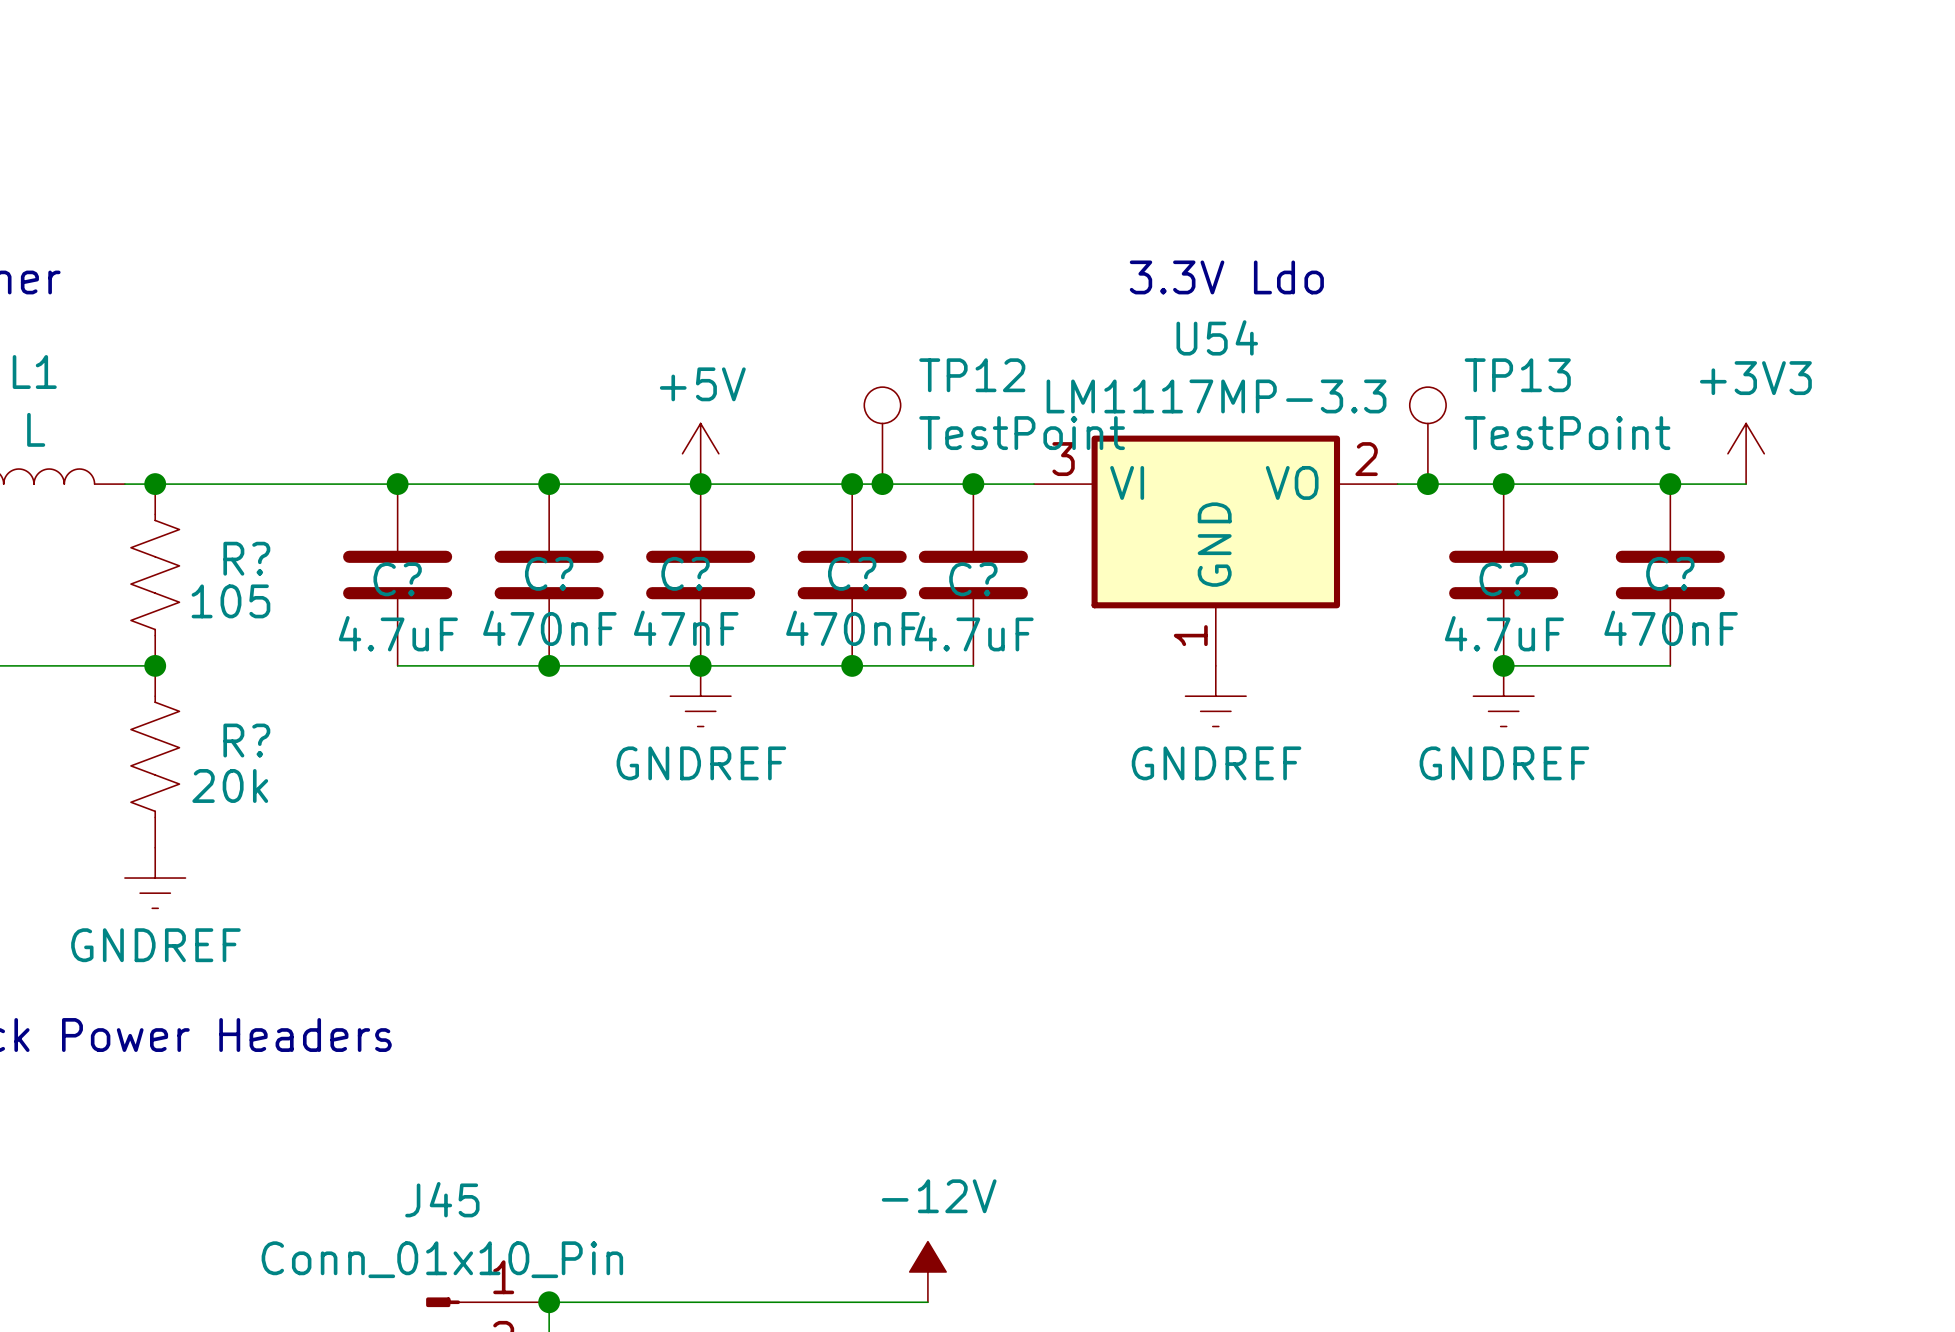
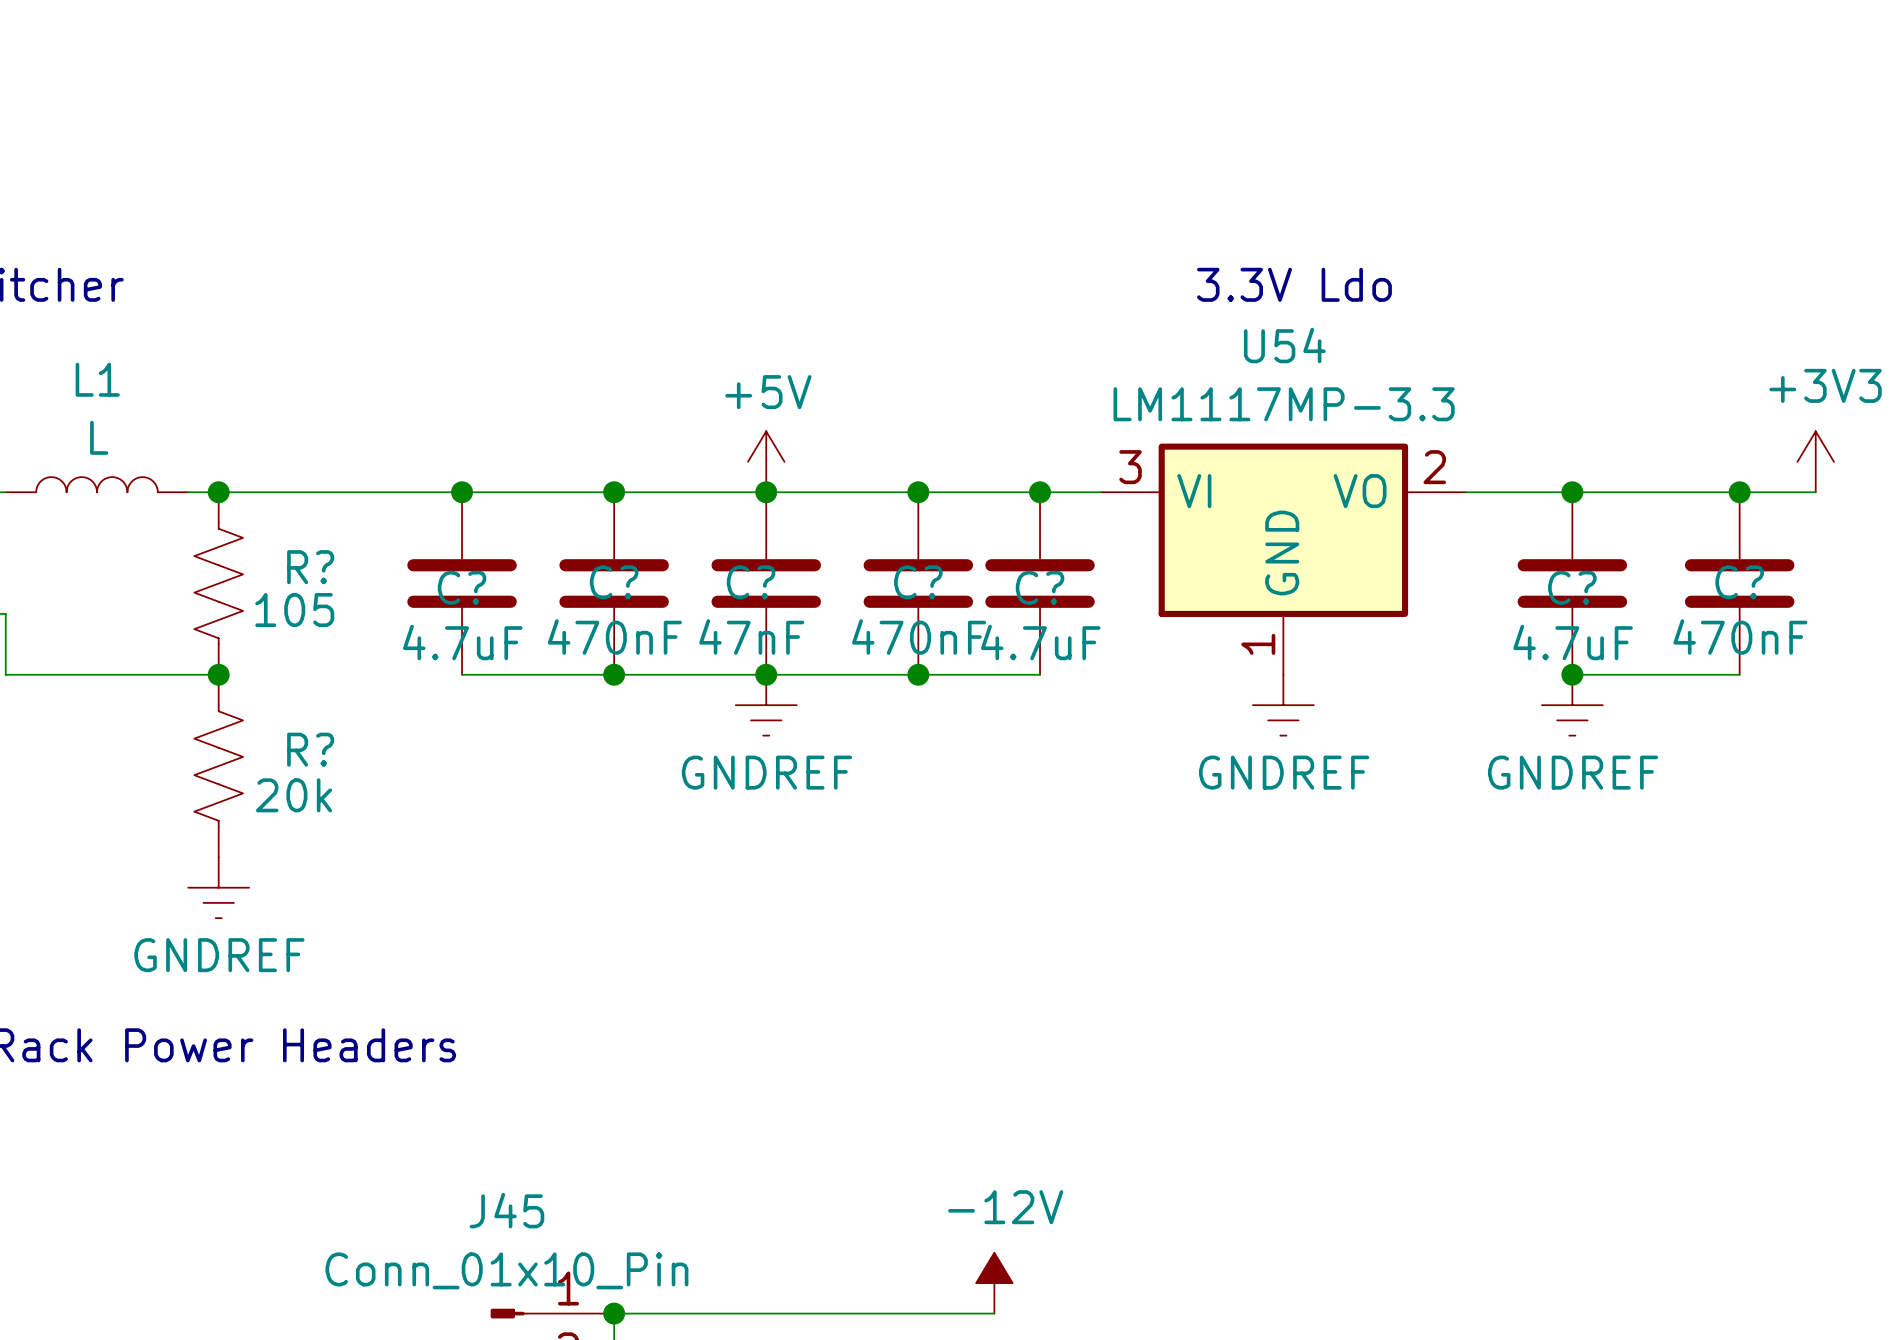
TP12: TestPoint (882, 435) -> none
TP13: TestPoint (1427, 435) -> none
junction: (882, 484) -> none
junction: (1427, 484) -> none

